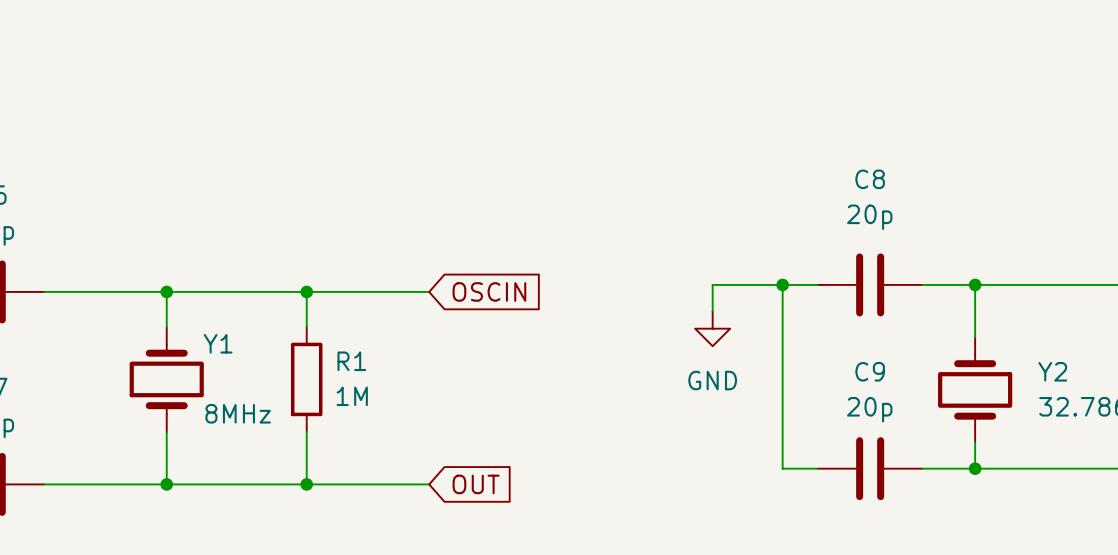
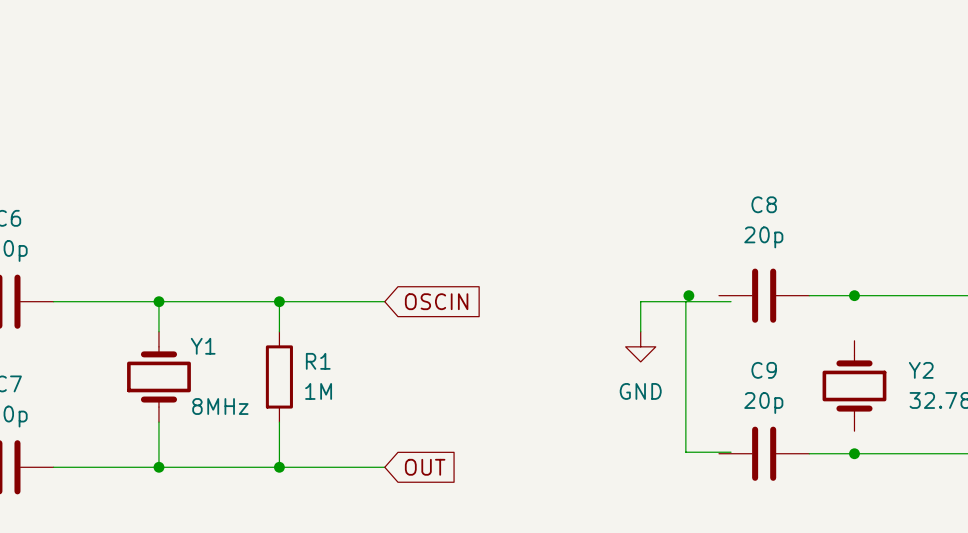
wire: (782, 284) (782, 468) (817, 468) -> none
wire: (817, 284) (712, 284) (712, 311) -> none
wire: (975, 284) (975, 337) -> none
wire: none -> (685, 301) (685, 452) (731, 452)
wire: none -> (731, 301) (640, 301) (640, 331)
power symbol position: GND (712, 328) -> GND (640, 346)
wire: (975, 442) (975, 468) -> none

